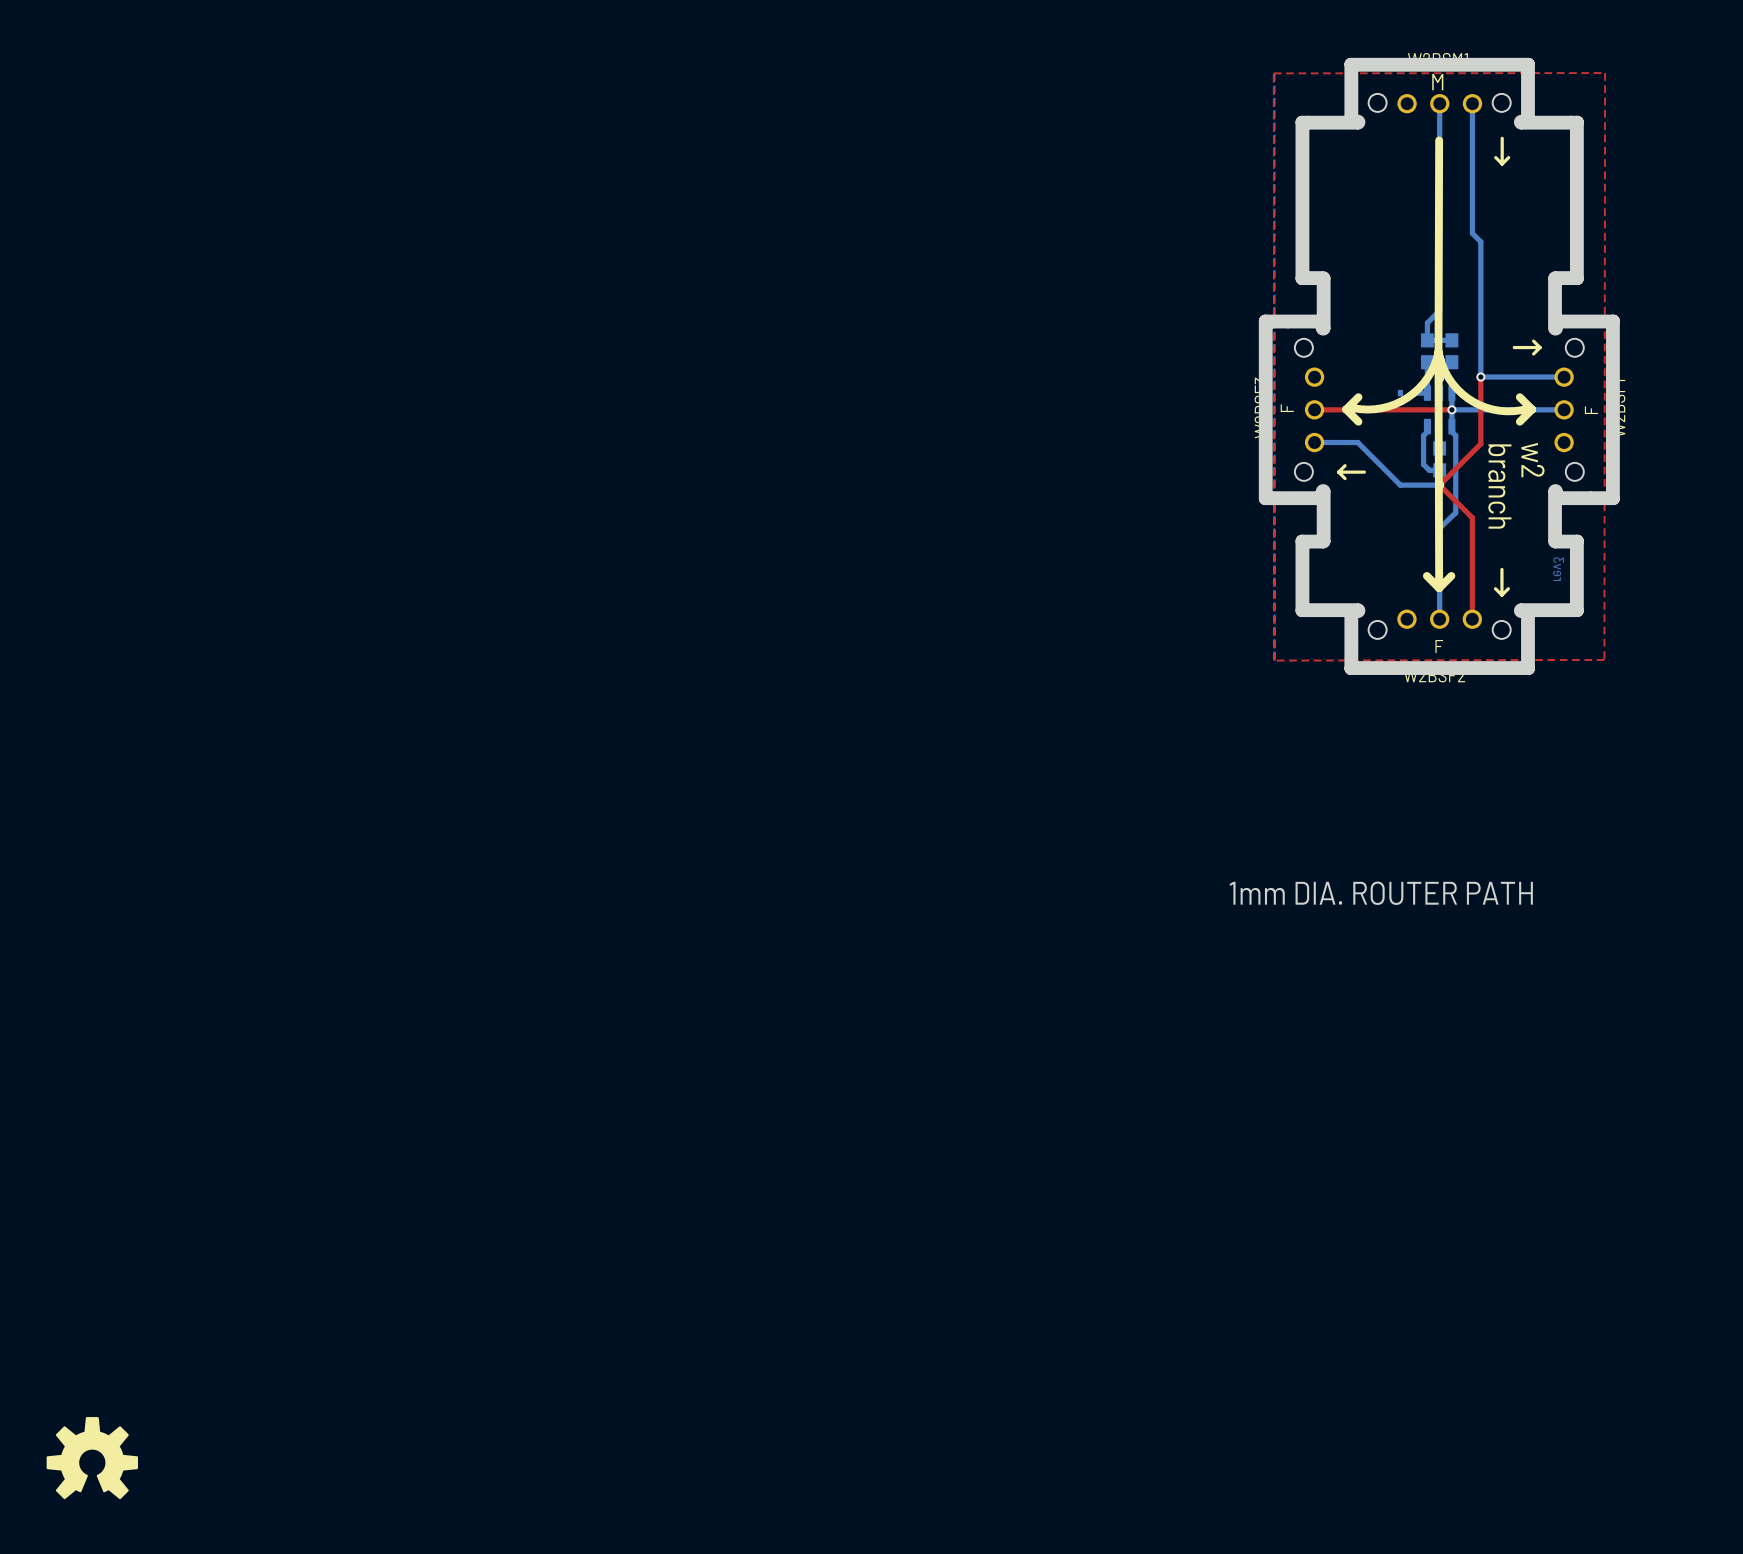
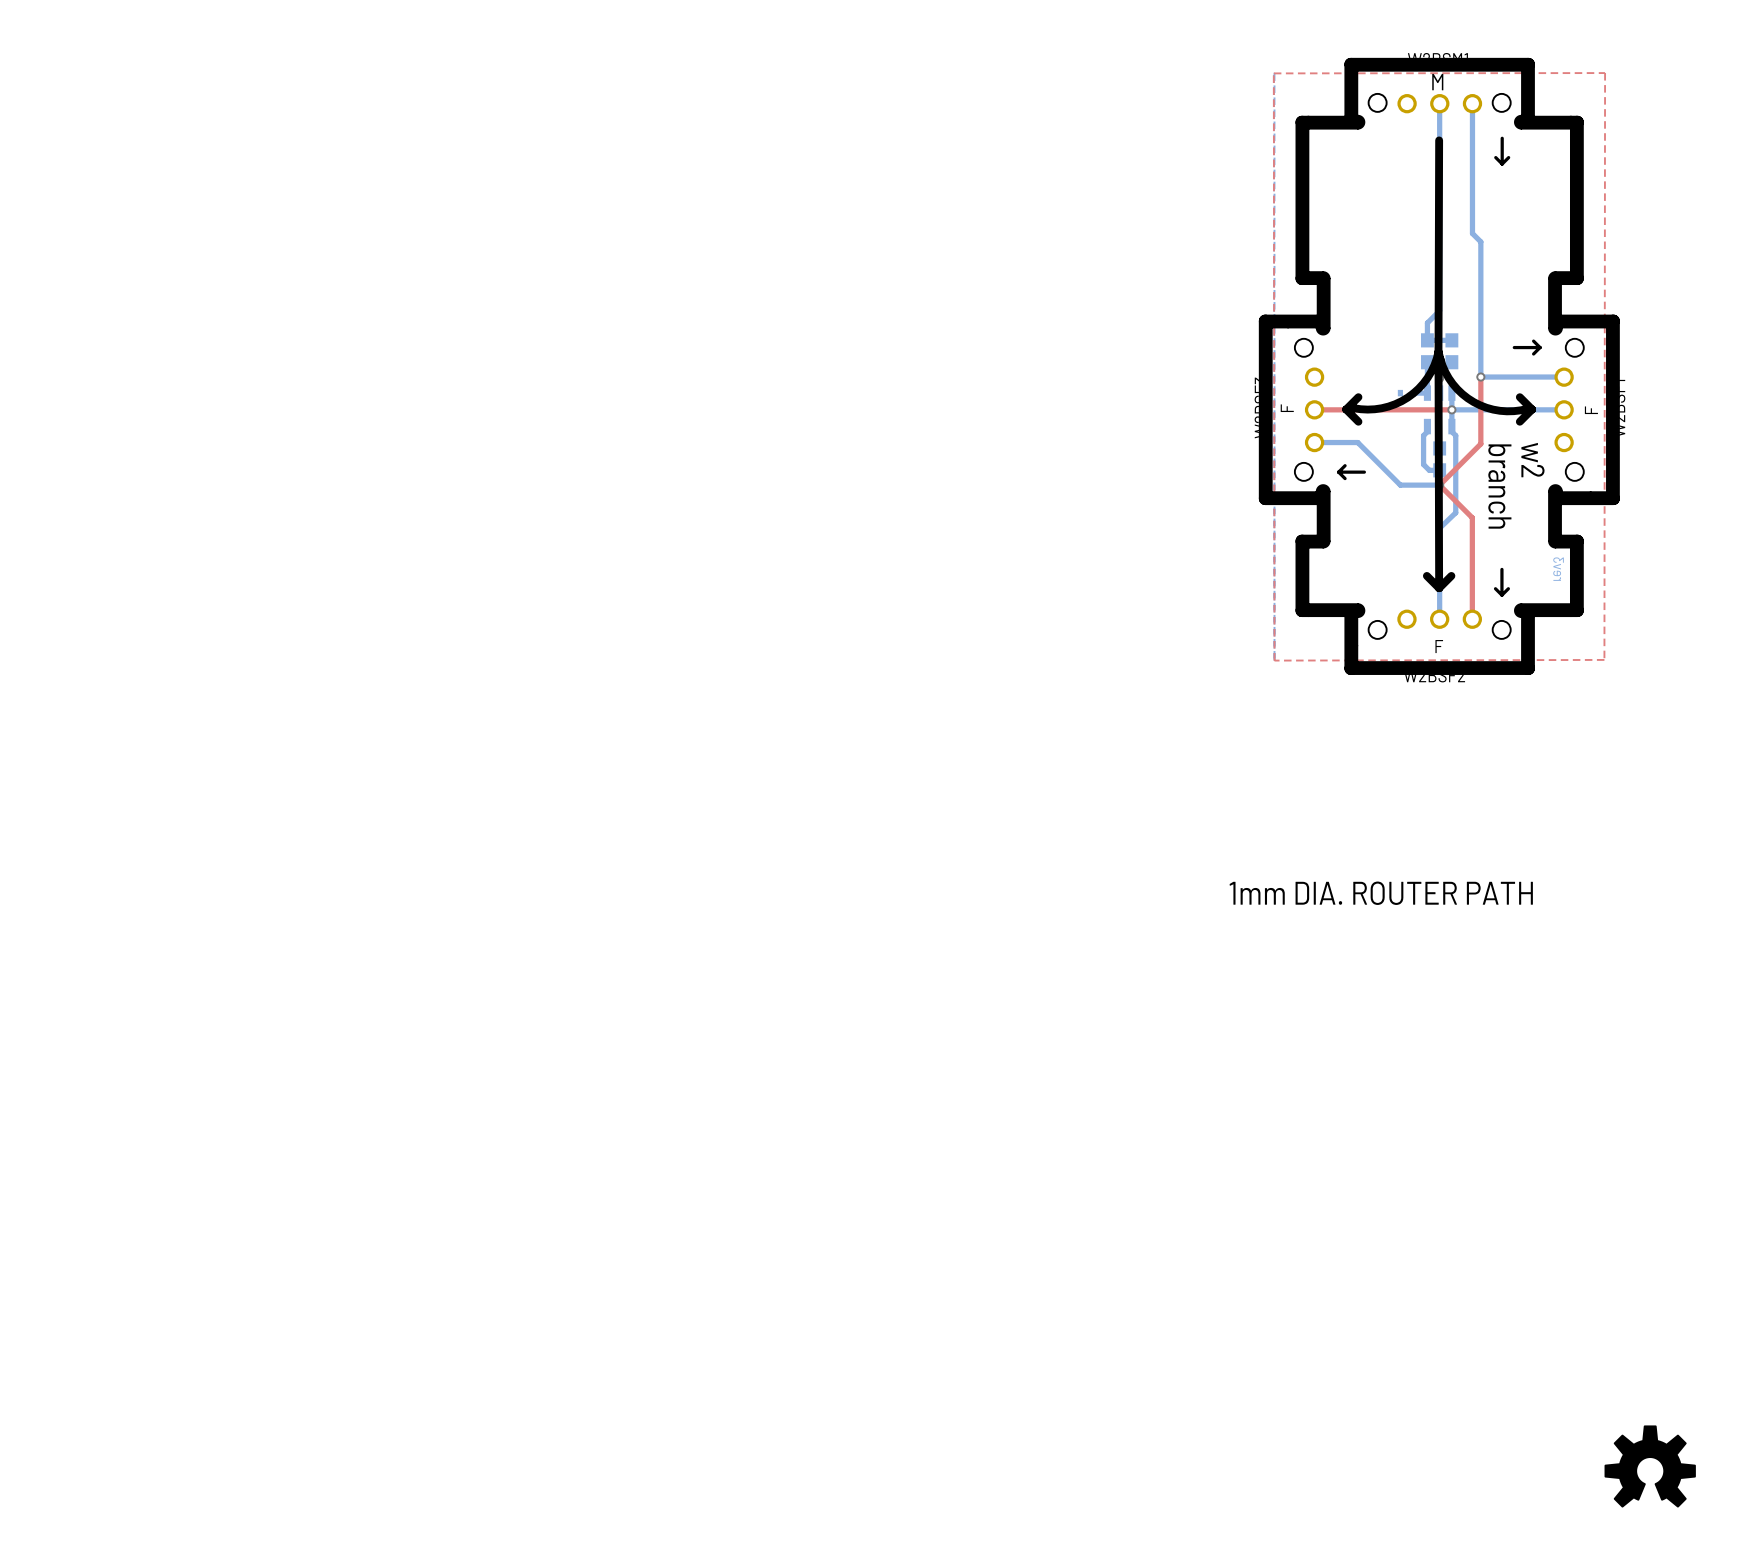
drawing: [46, 1417, 138, 1500] -> none
drawing: none -> [1604, 1425, 1696, 1508]

